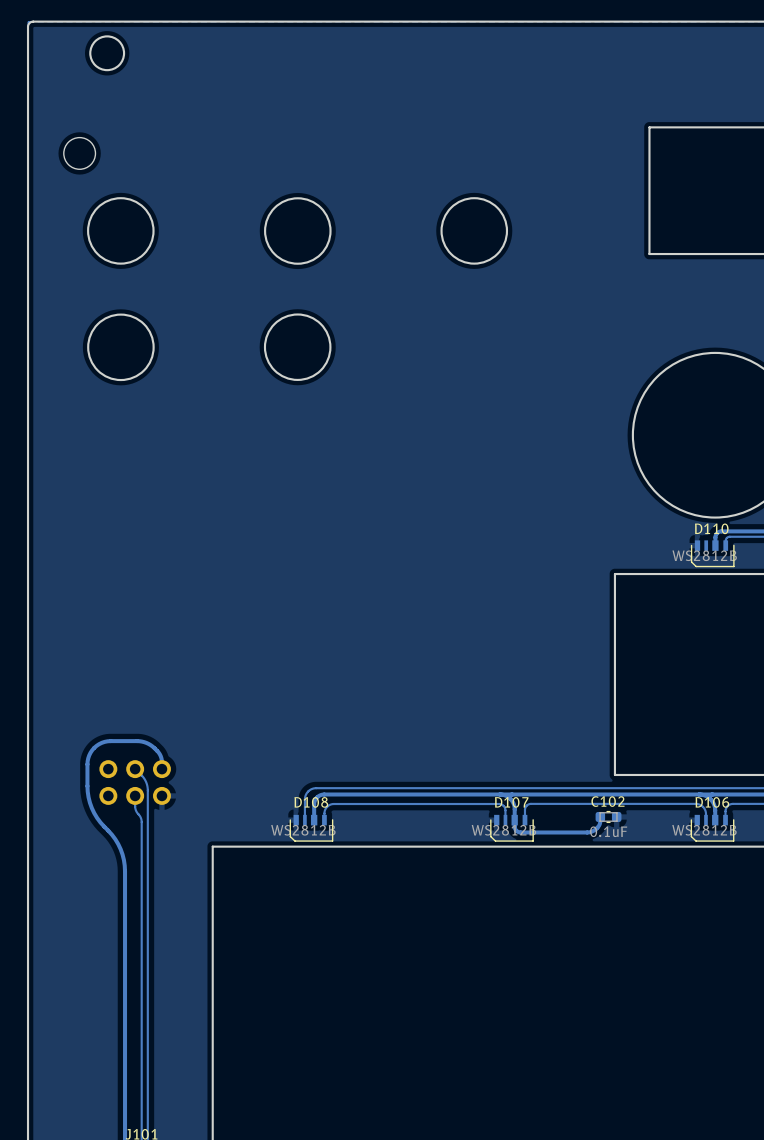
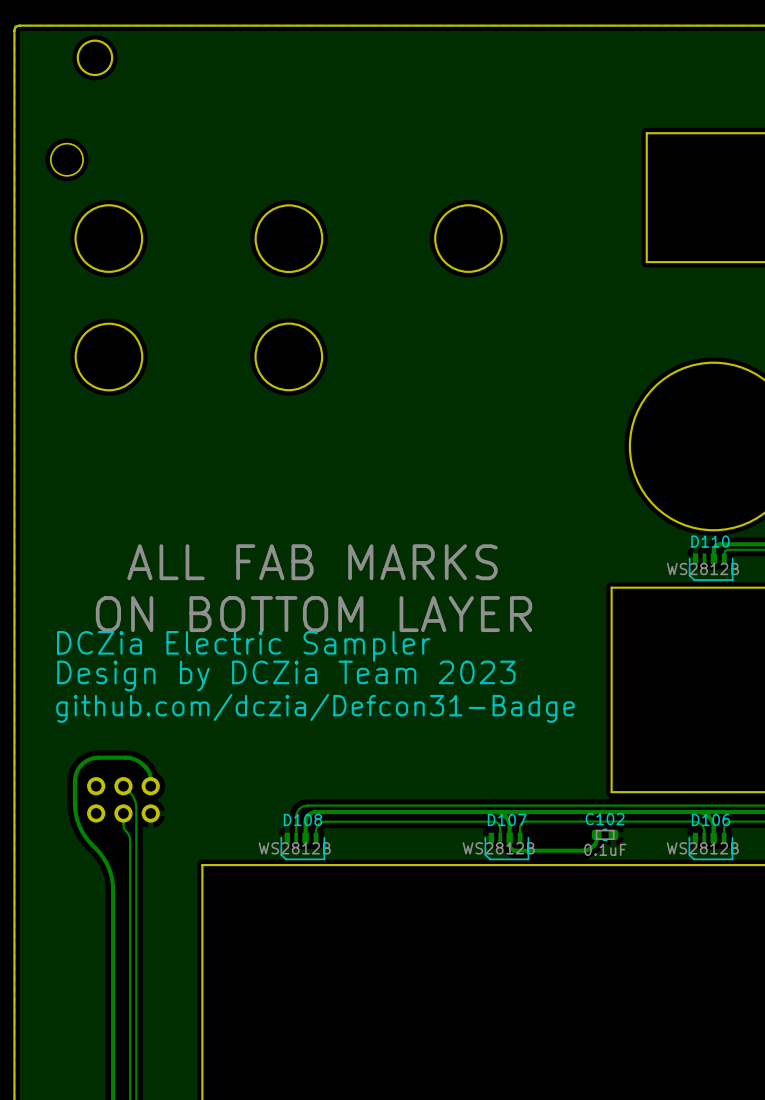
text: none -> ALL FAB MARKS (312, 562)
text: none -> ON BOTTOM LAYER (314, 614)
text: none -> DCZia Electric Sampler (243, 646)
text: none -> Design by DCZia Team 2023 (286, 675)
text: none -> github.com/dczia/Defcon31-Badge (315, 708)

